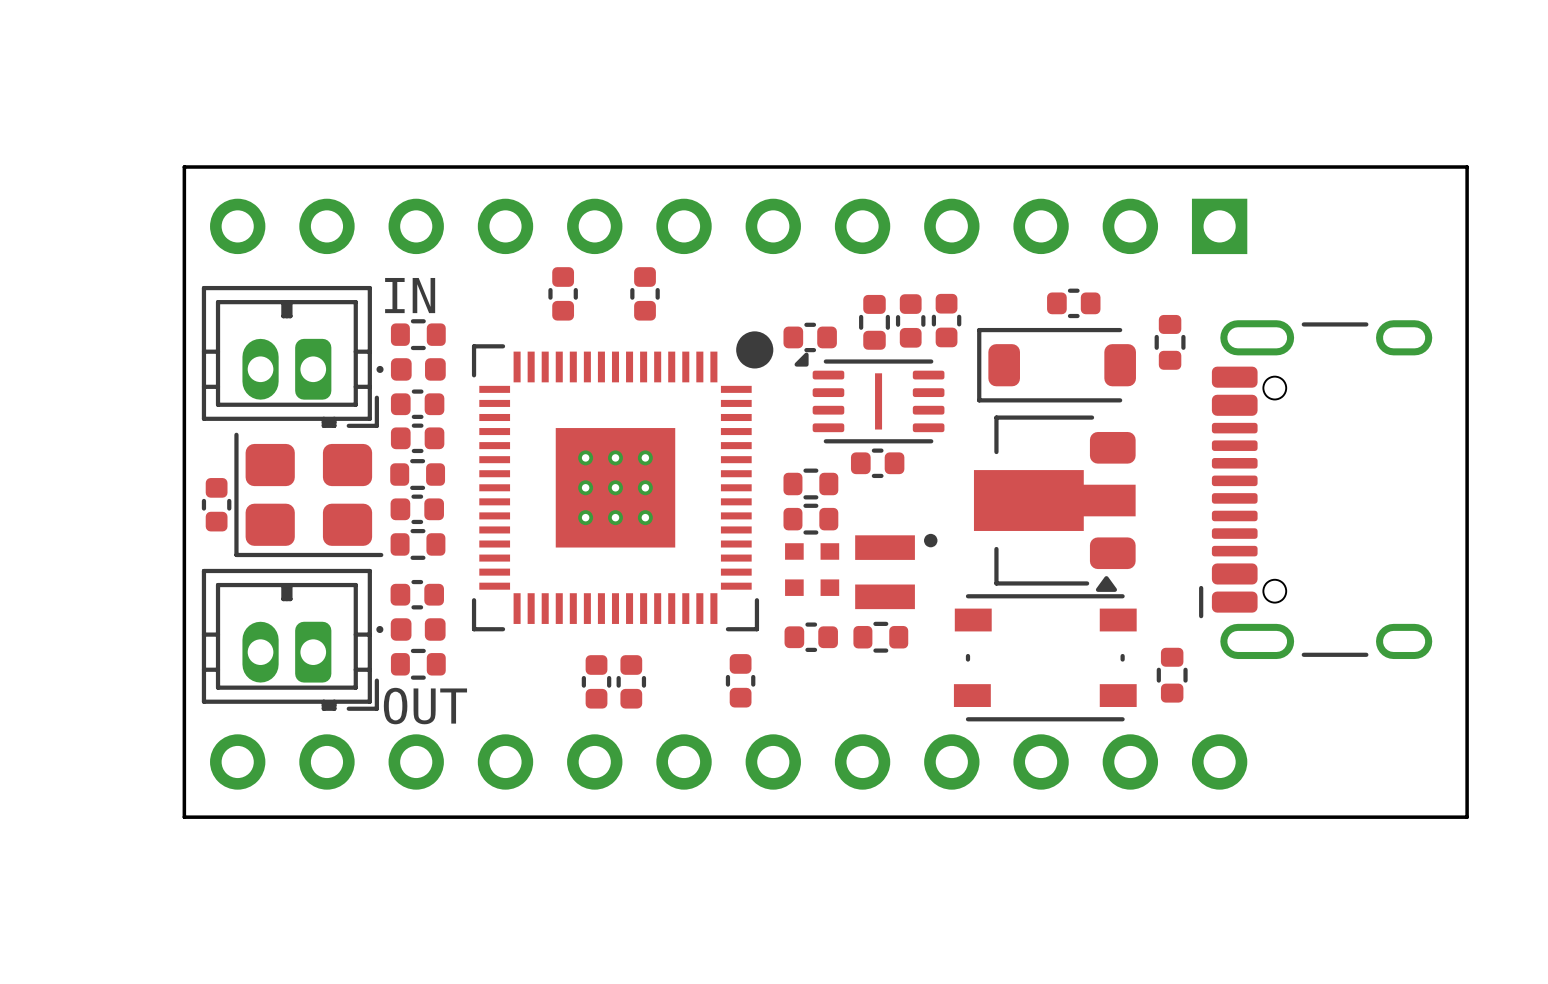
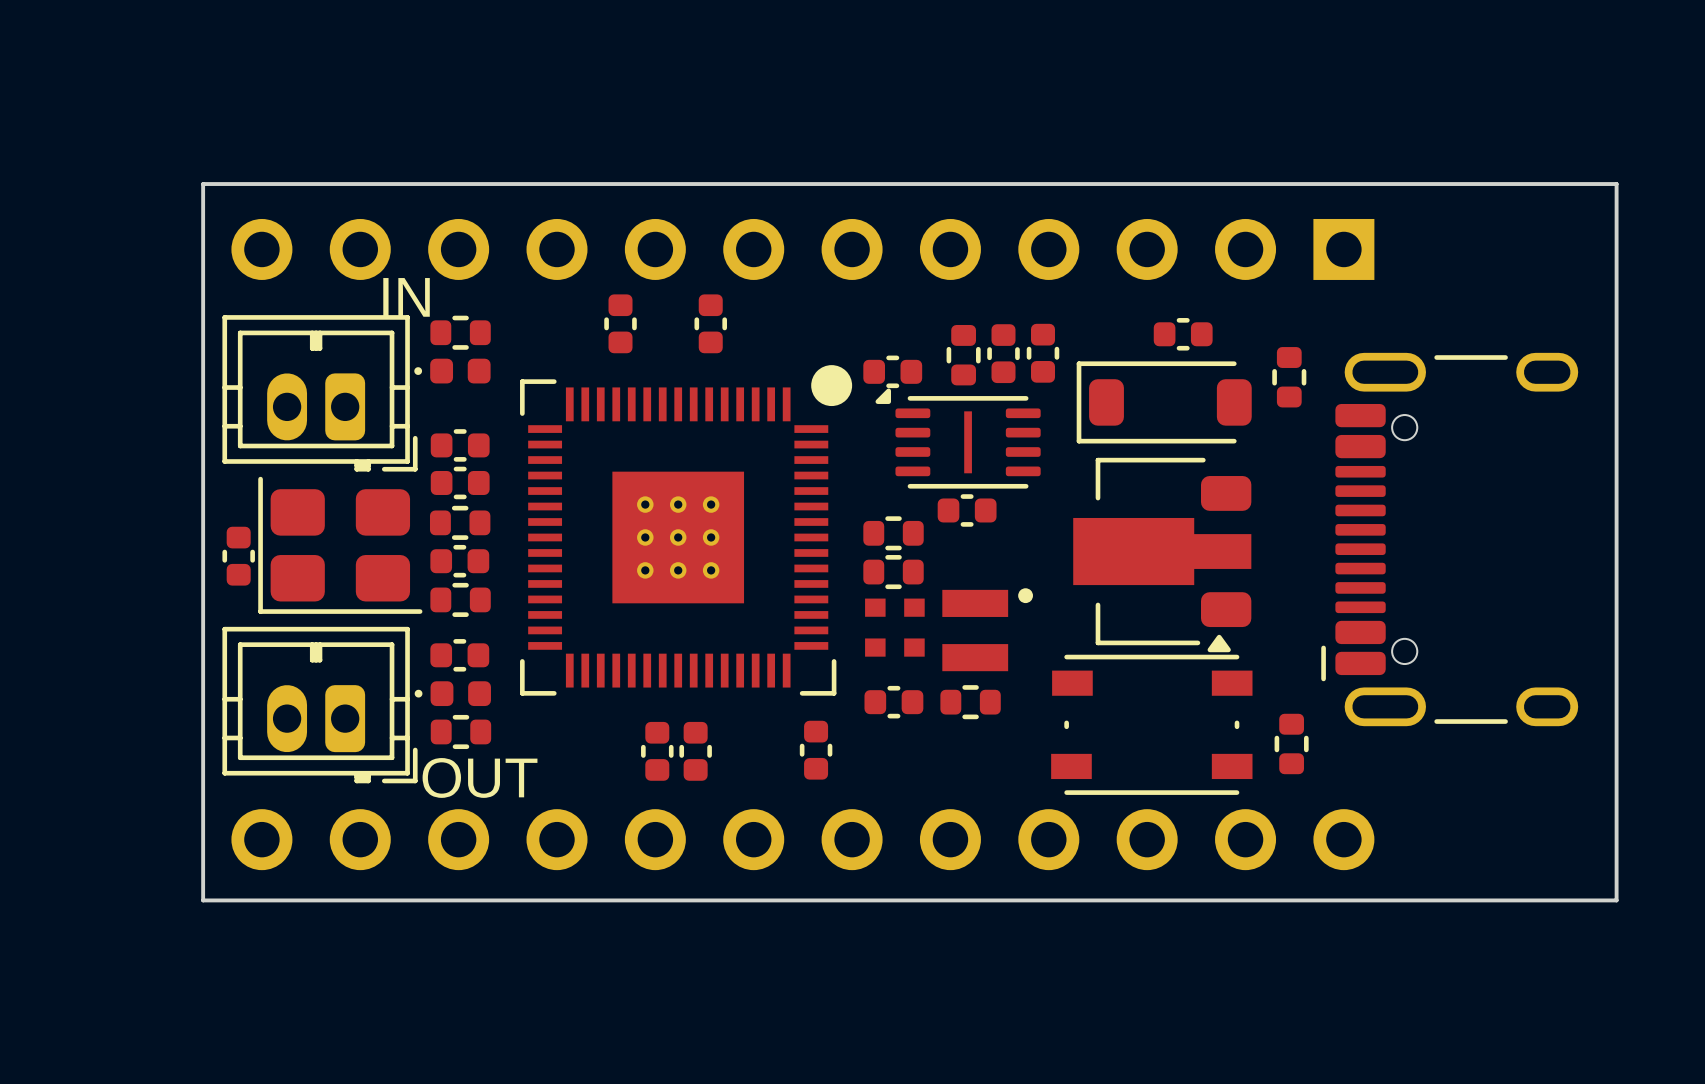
text position: IN (410, 295) -> IN (406, 297)
part: none -> (460, 332)
part footprint: [390, 319, 446, 351] -> [414, 358, 491, 384]
part: (411, 369) -> none

